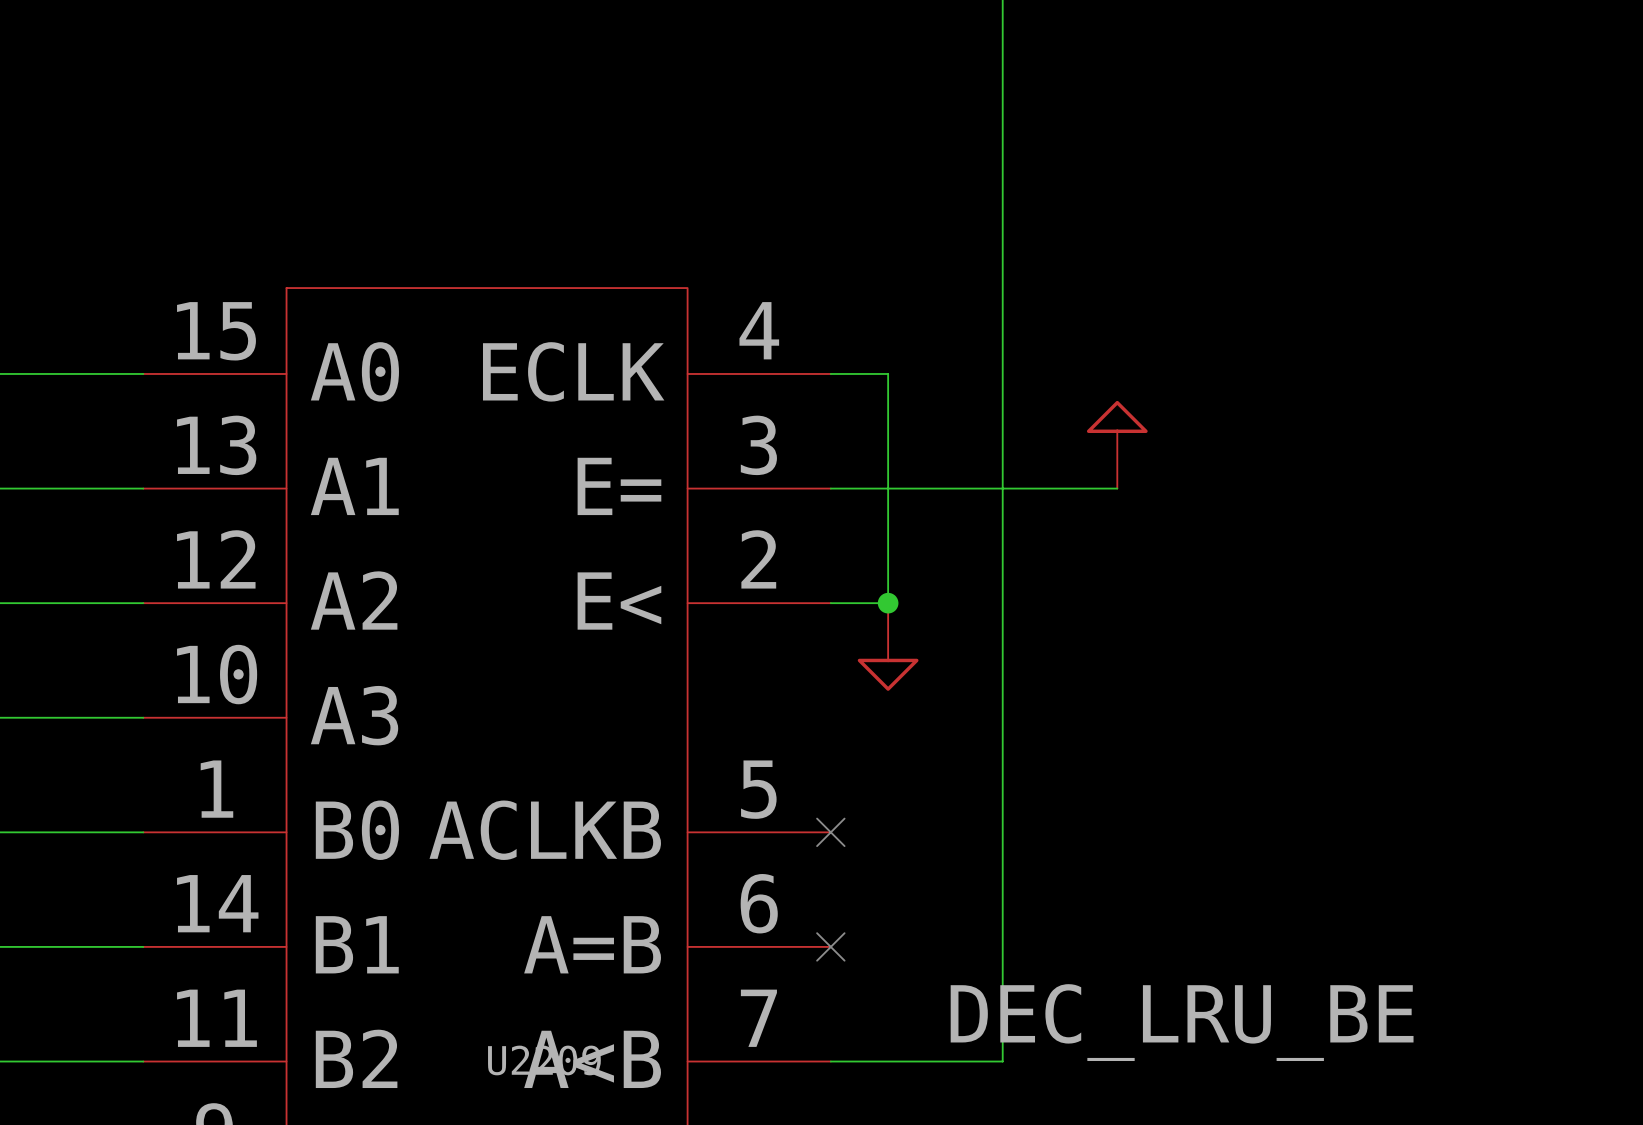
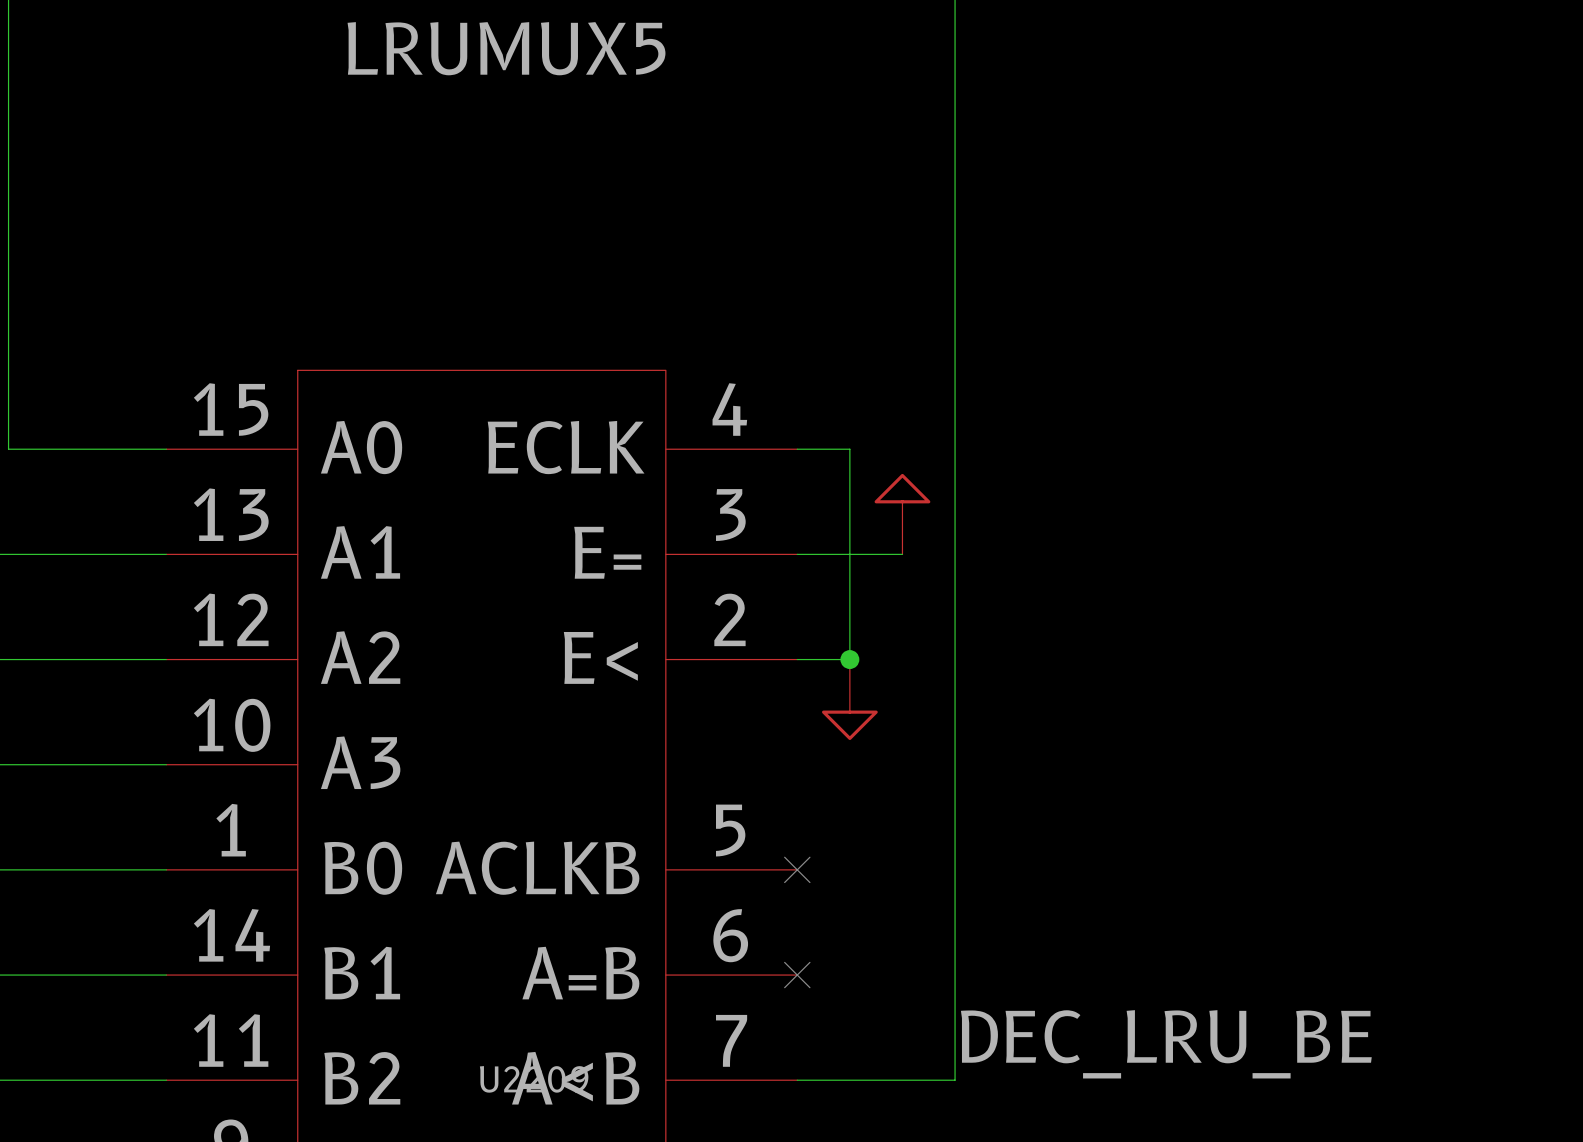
power symbol position: (1117, 444) -> (902, 514)
wire: (945, 488) (1117, 488) -> none
label position: DEC_LRU_BE (1182, 1022) -> DEC_LRU_BE (1166, 1044)

